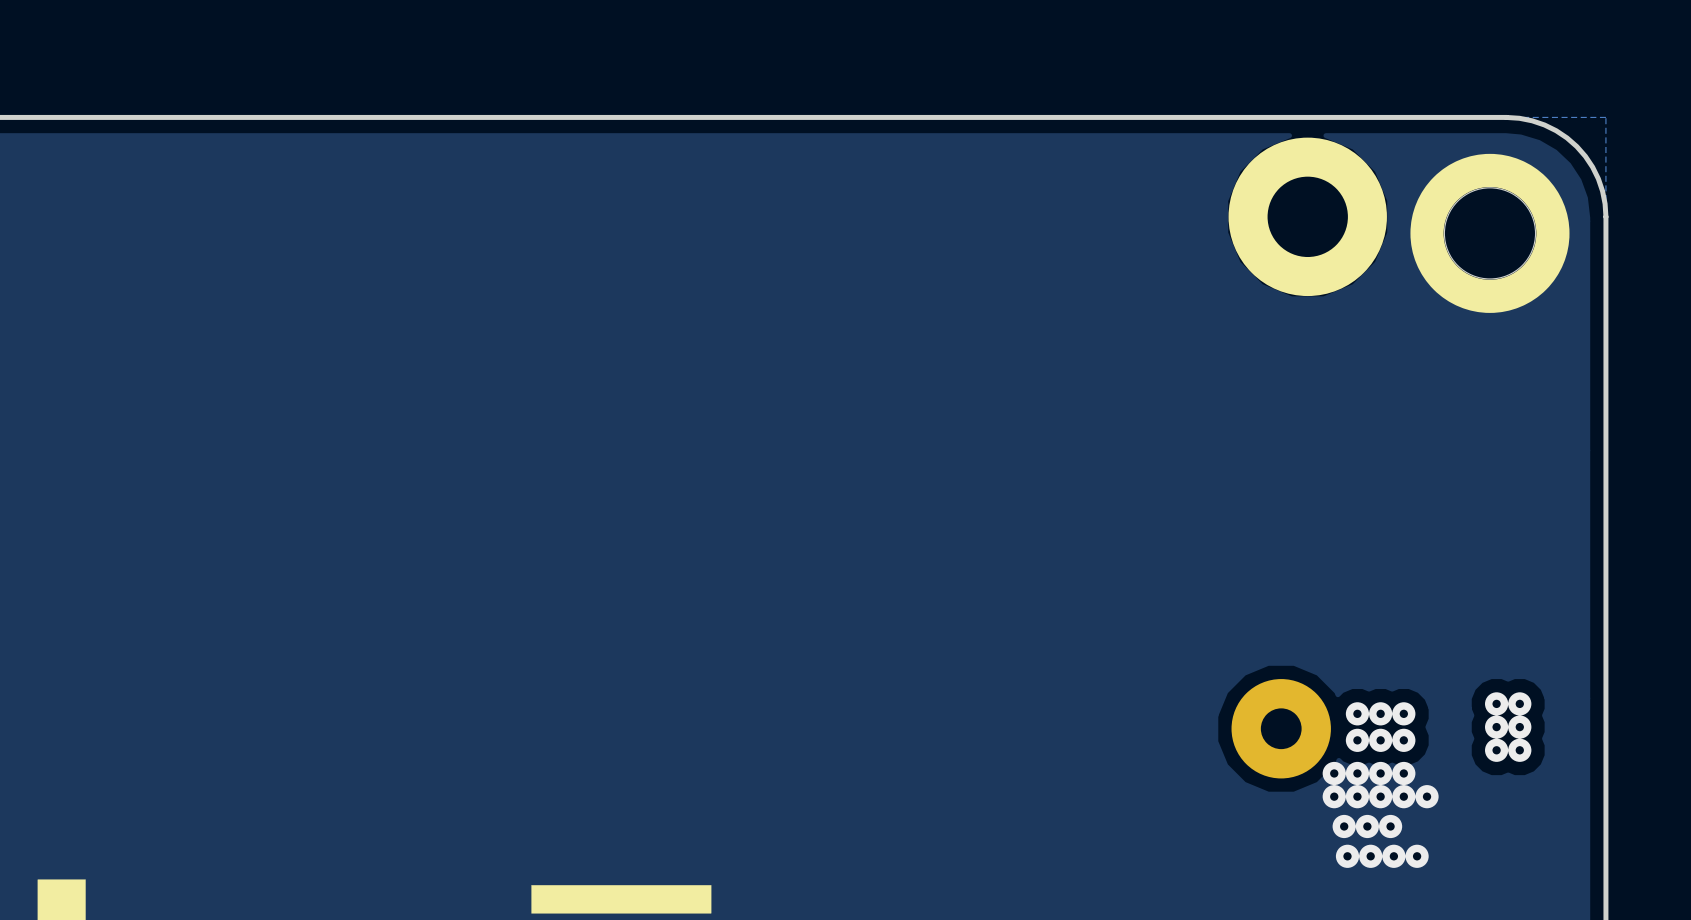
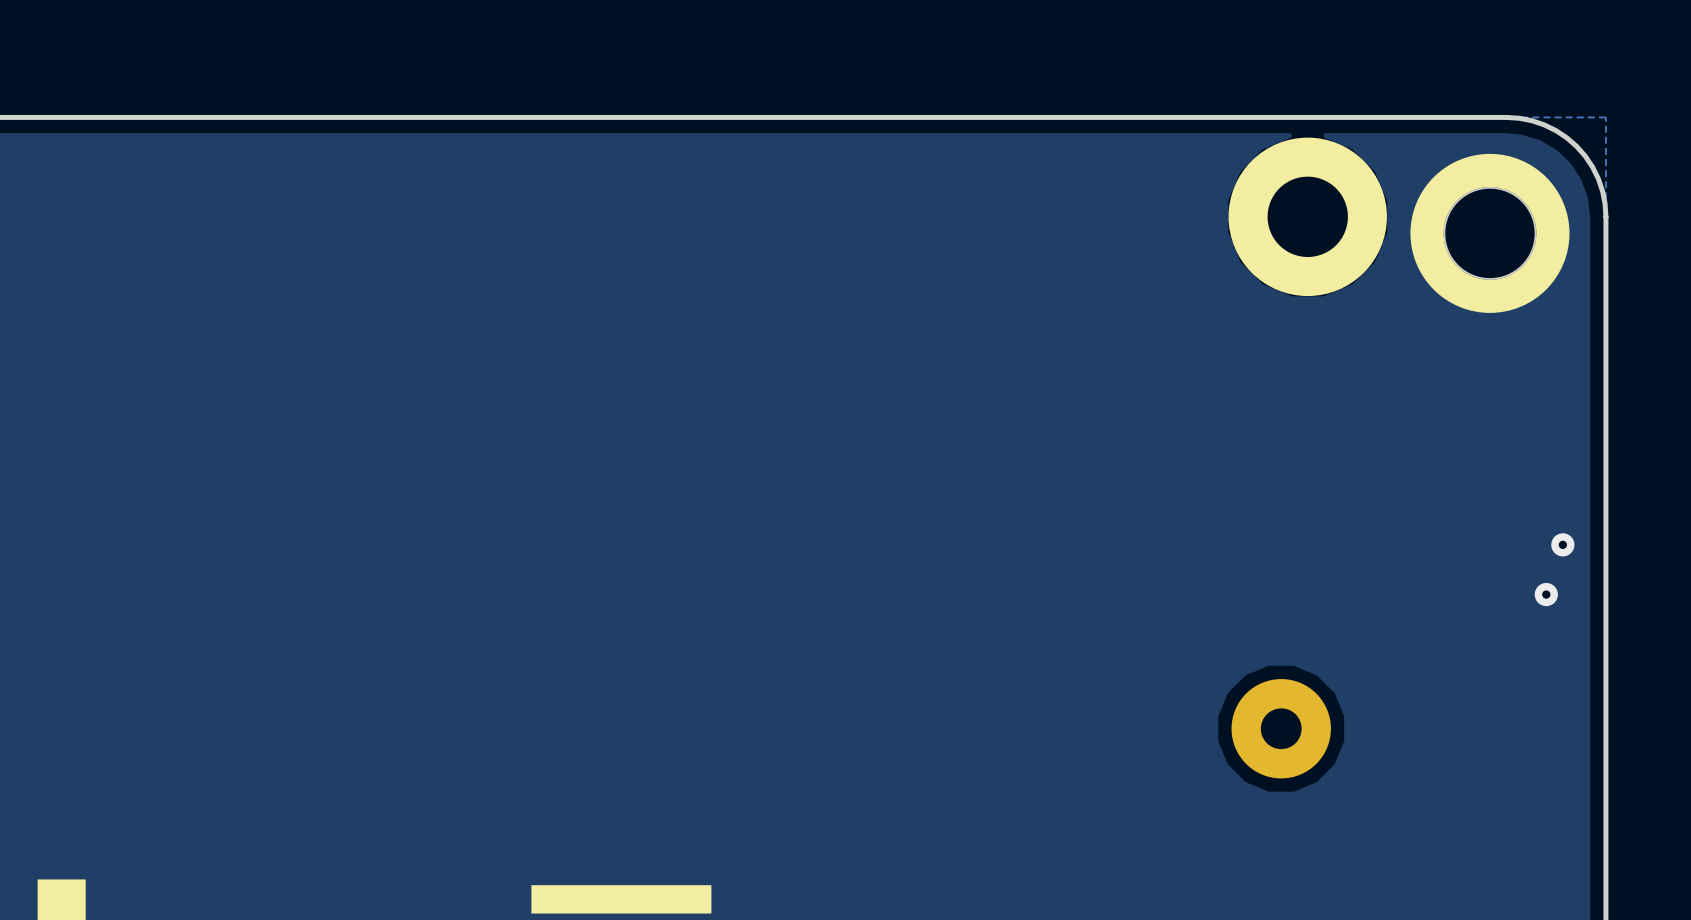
via: none -> (1562, 544)
via: none -> (1546, 594)
via: (1496, 703) -> none
via: (1519, 703) -> none
via: (1357, 713) -> none
via: (1380, 713) -> none
via: (1403, 713) -> none
via: (1496, 727) -> none
via: (1519, 727) -> none
via: (1357, 740) -> none
via: (1380, 740) -> none
via: (1403, 740) -> none
via: (1496, 750) -> none
via: (1519, 750) -> none
via: (1334, 773) -> none
via: (1357, 773) -> none
via: (1380, 773) -> none
via: (1403, 773) -> none
via: (1334, 796) -> none
via: (1357, 796) -> none
via: (1380, 796) -> none
via: (1403, 796) -> none
via: (1427, 796) -> none
via: (1344, 826) -> none
via: (1367, 826) -> none
via: (1390, 826) -> none
via: (1347, 856) -> none
via: (1370, 856) -> none
via: (1393, 856) -> none
via: (1417, 856) -> none

